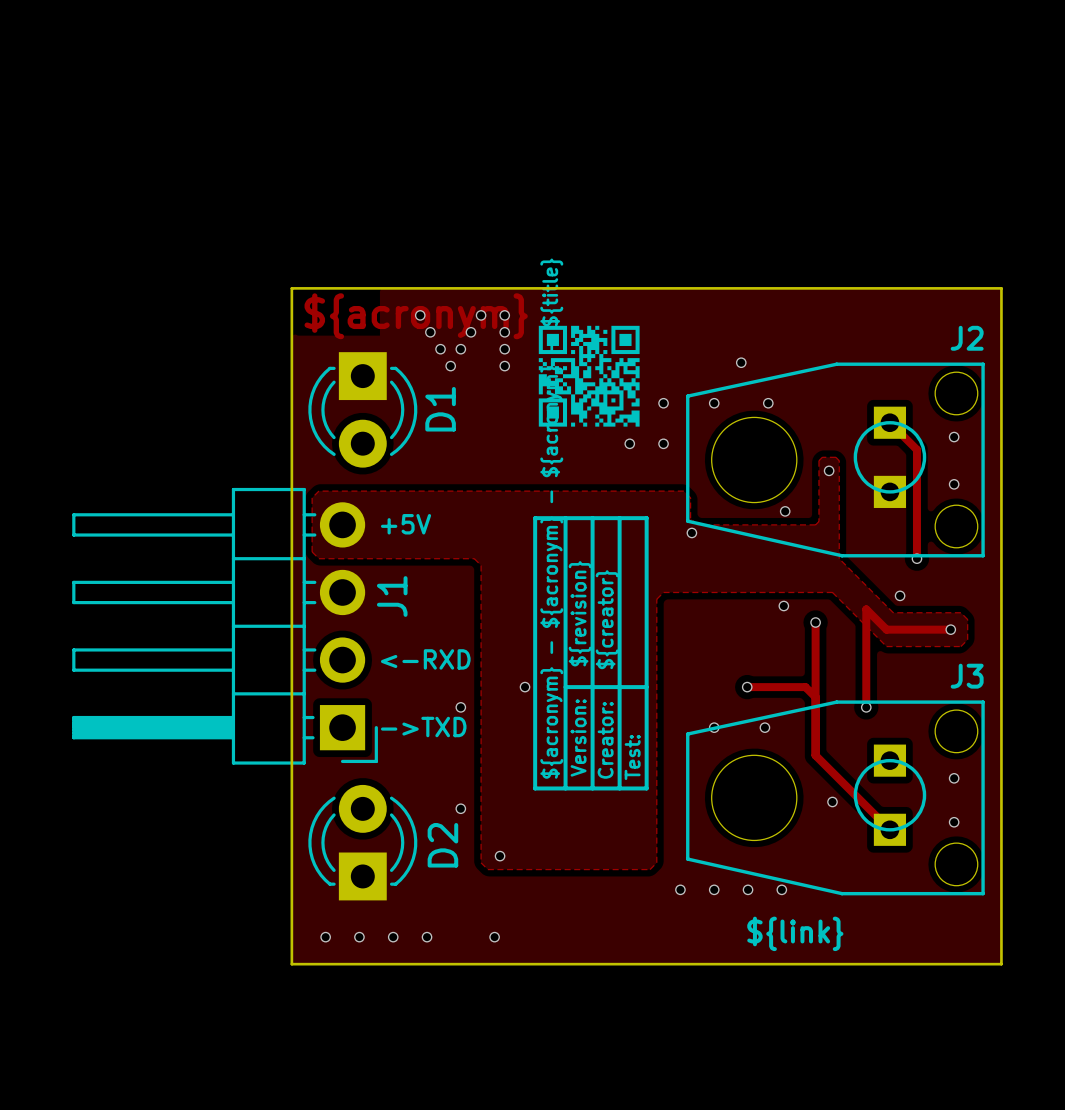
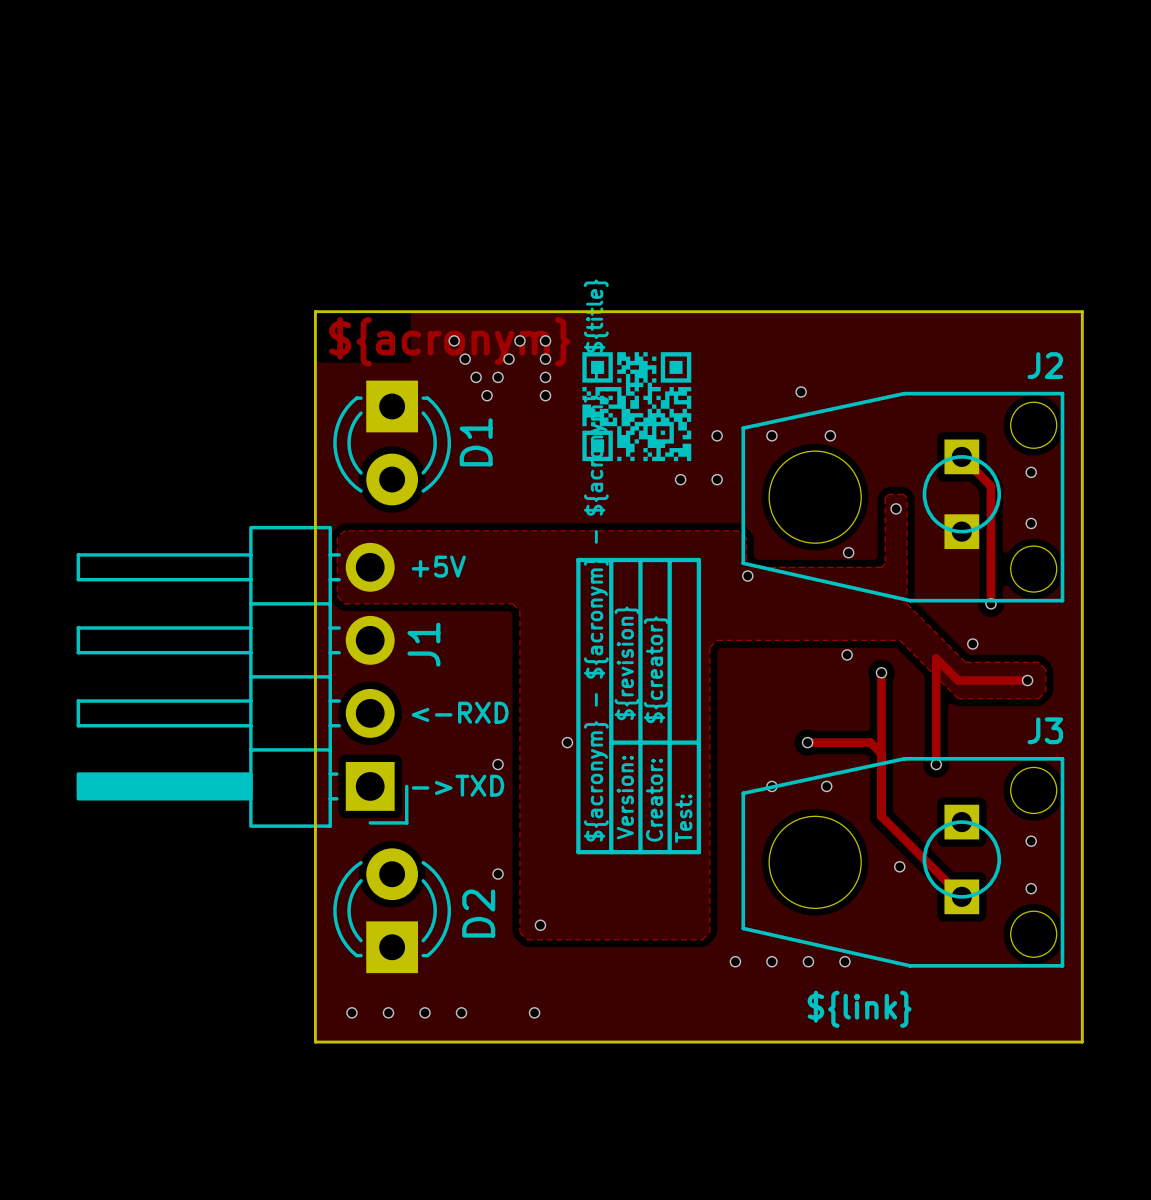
J1 footprint: [72, 487, 378, 765] -> [76, 525, 409, 828]

